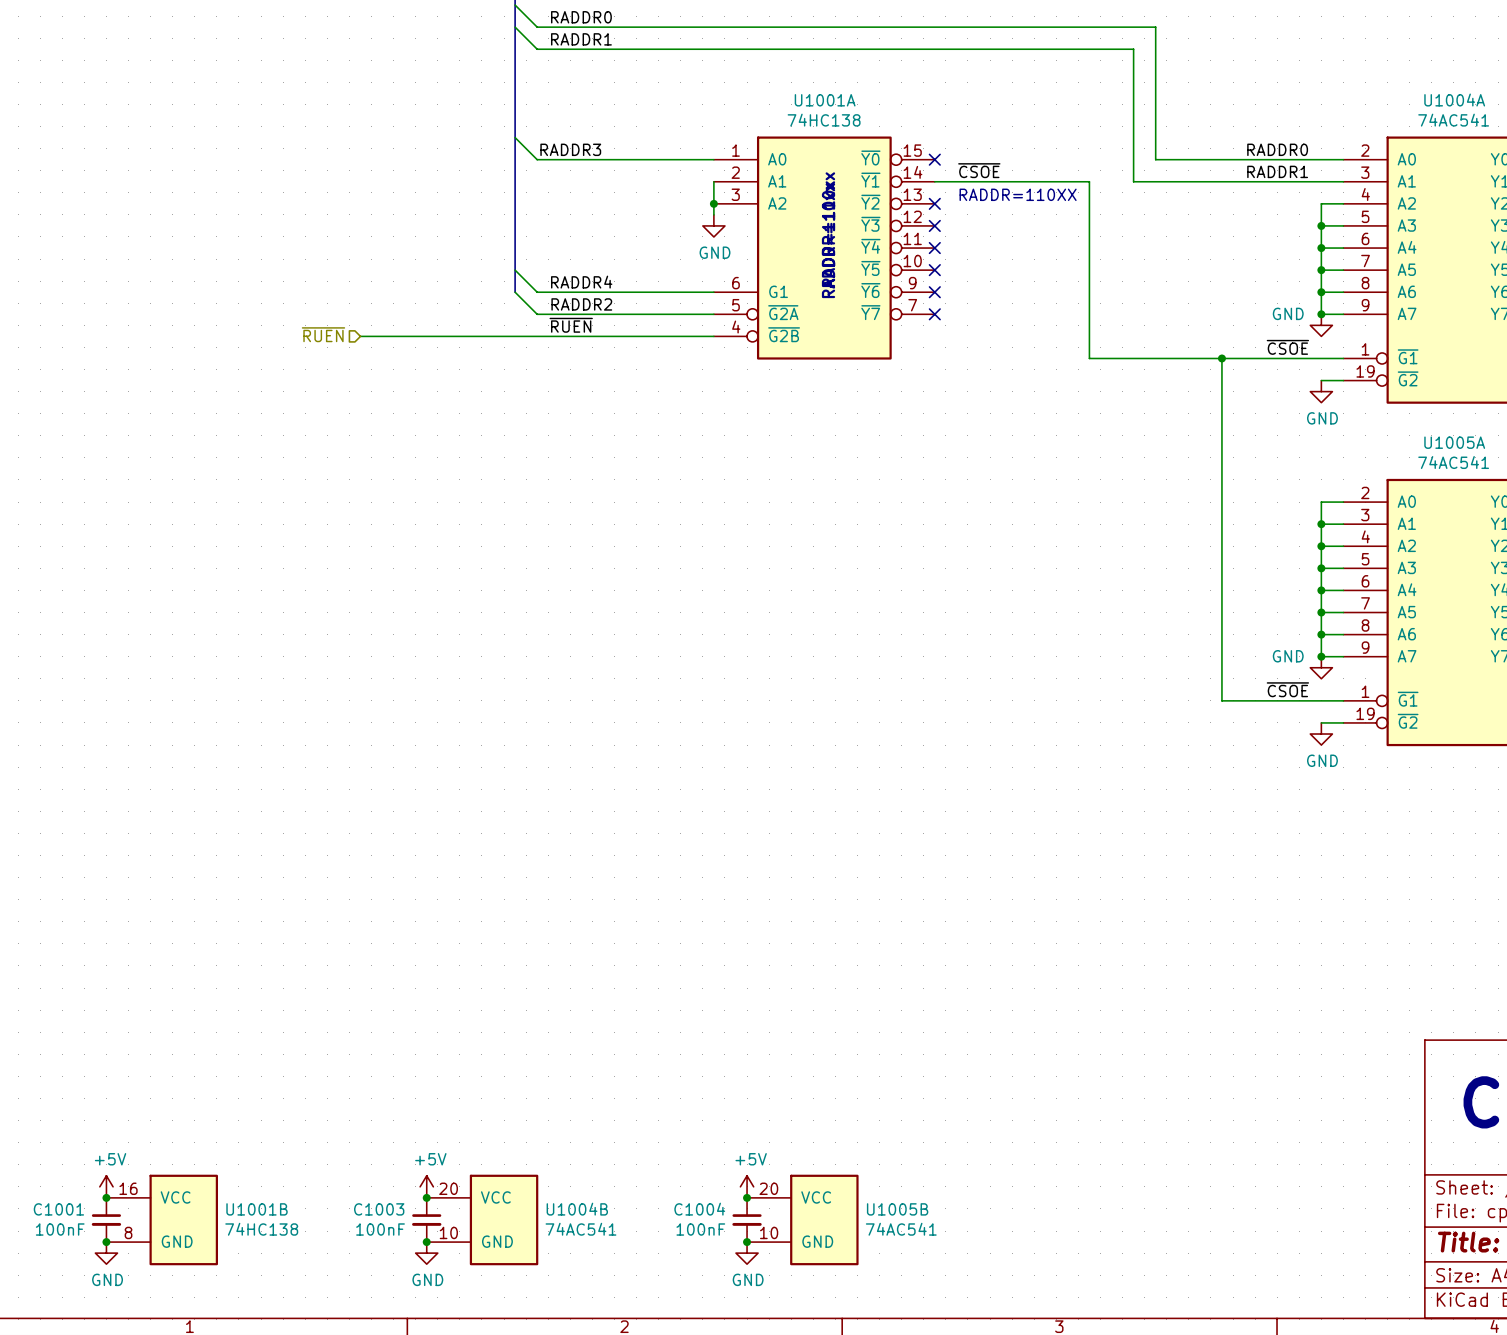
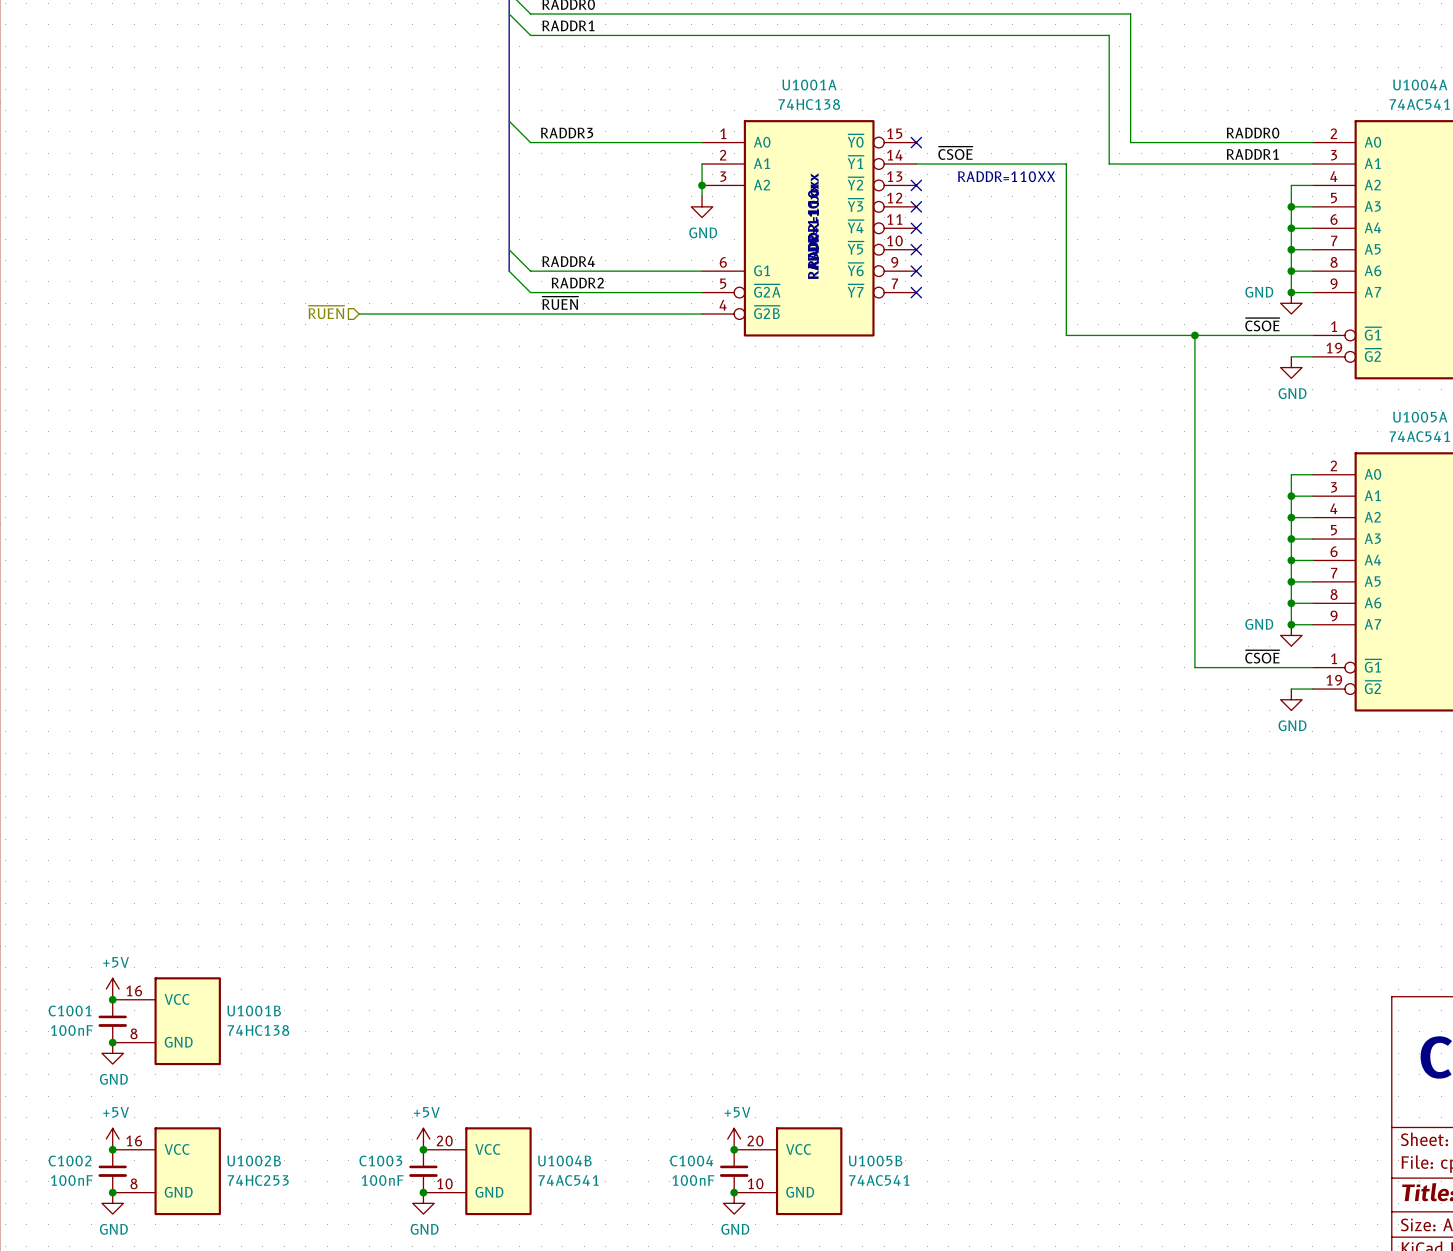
power symbol: none -> +5V (112, 989)
junction: none -> (112, 999)
C1001: none -> 100nF (112, 1021)
U1001B: none -> 74HC138 (166, 1021)
junction: none -> (112, 1042)
power symbol: none -> GND (112, 1053)
C1001 name: C1001 (58, 1209) -> C1002 (70, 1161)
U1001B name: U1001B (256, 1209) -> U1002B (254, 1161)
U1001B value: 74HC138 (261, 1229) -> 74HC253 (258, 1180)

